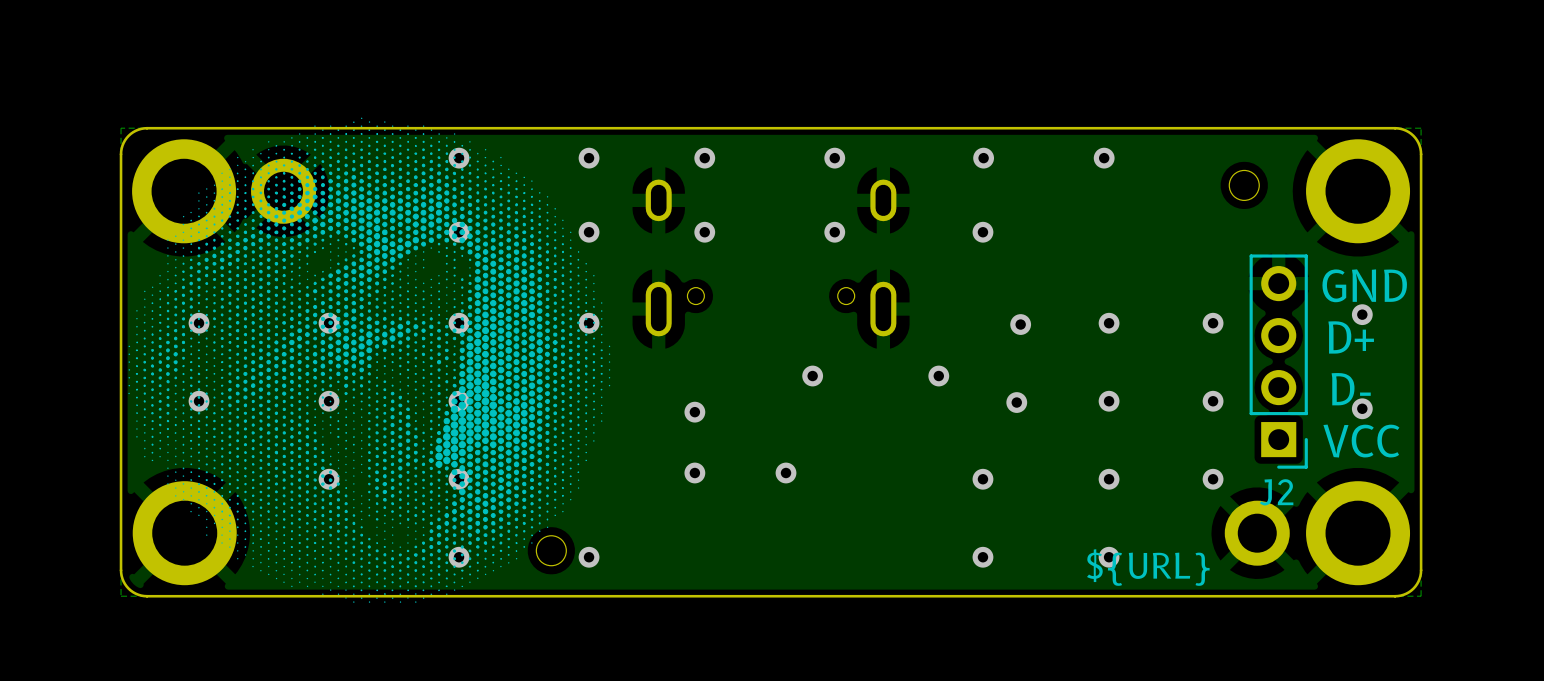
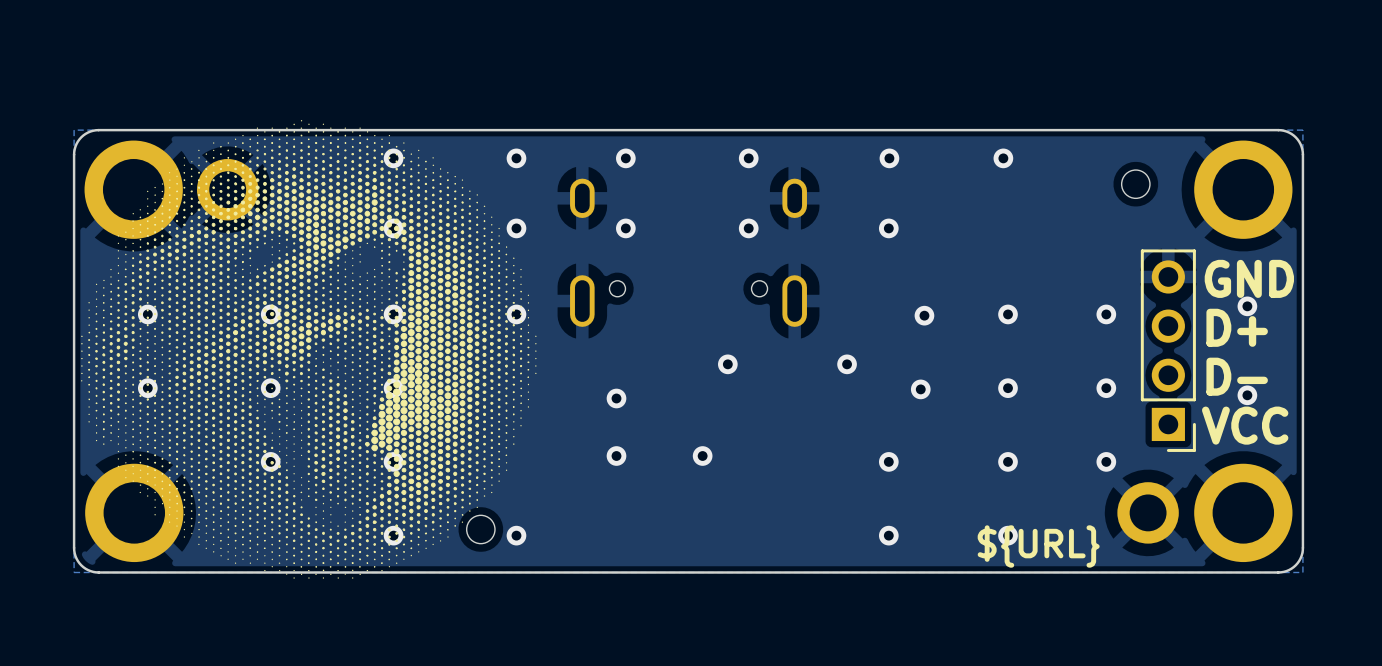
J2 name: J2 (1276, 492) -> none

